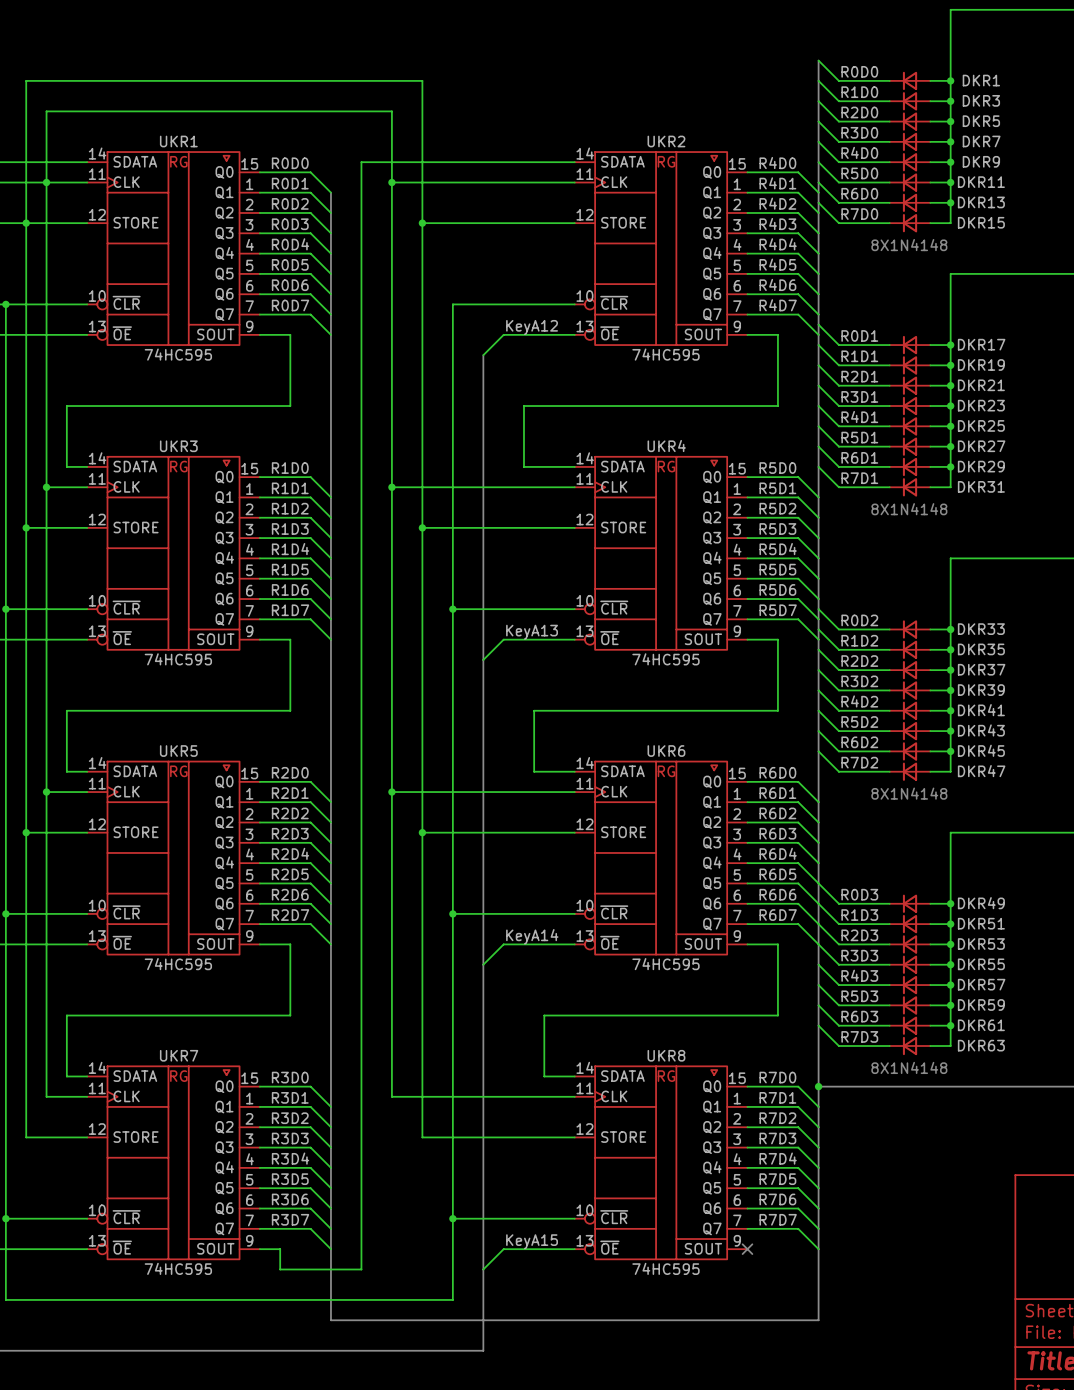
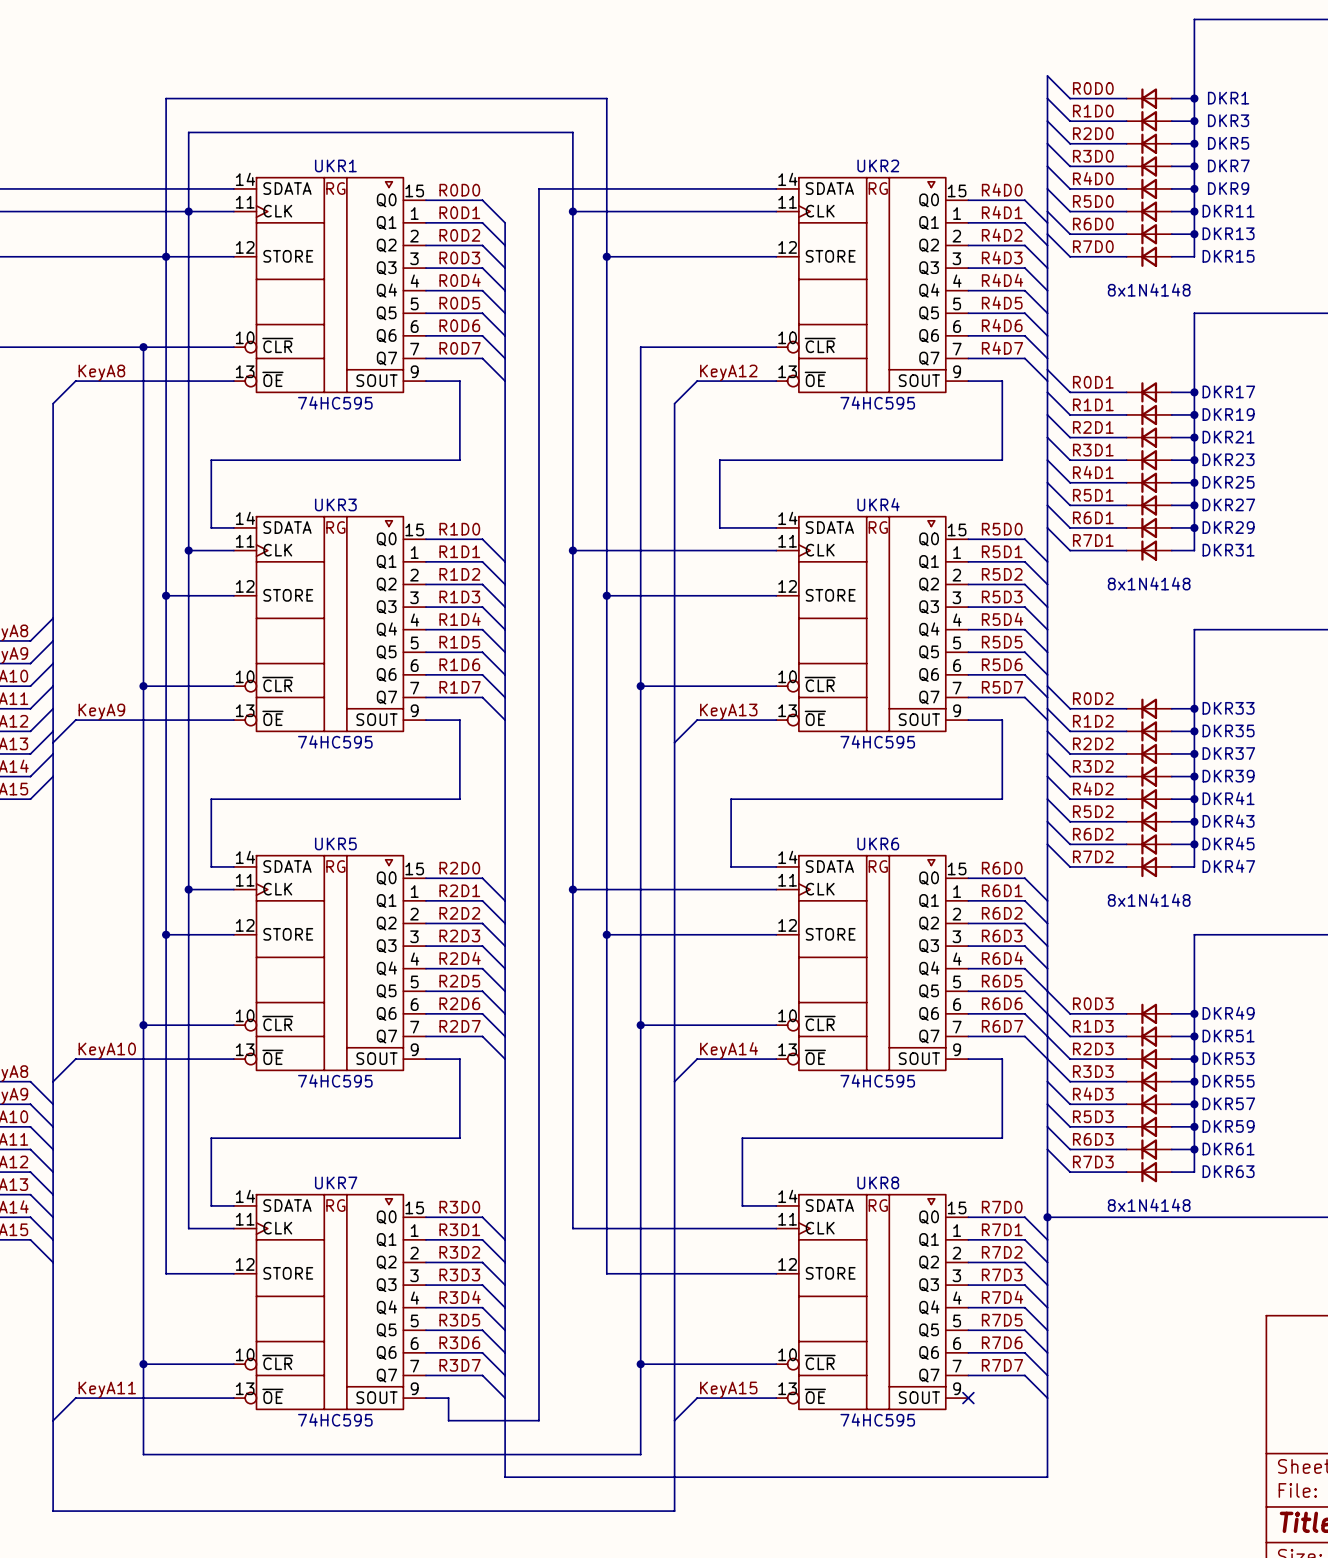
text: 8X1N4148 (909, 245) -> none
DKR15 value: none -> 8x1N4148 (1149, 289)
text: 8X1N4148 (909, 509) -> none
DKR31 value: none -> 8x1N4148 (1149, 583)
text: 8X1N4148 (909, 793) -> none
DKR47 value: none -> 8x1N4148 (1149, 900)
text: 8X1N4148 (909, 1067) -> none
DKR63 value: none -> 8x1N4148 (1149, 1205)

